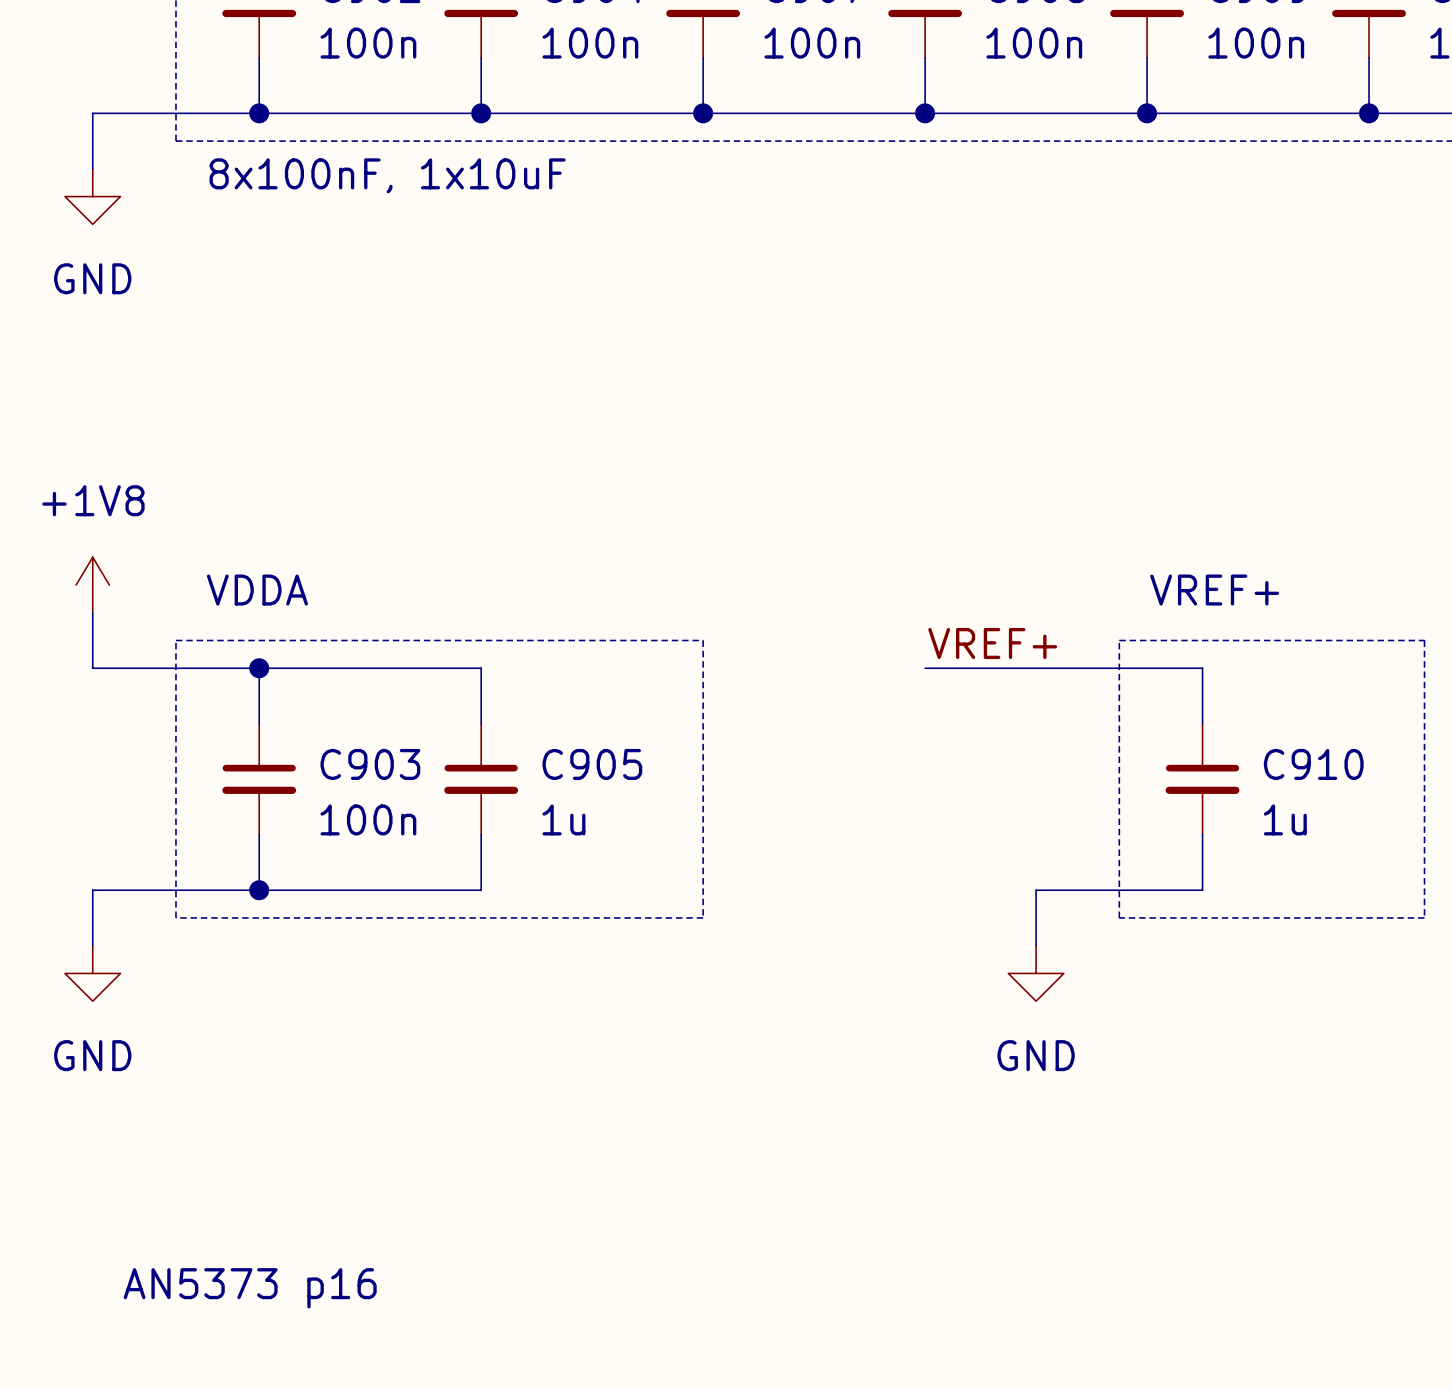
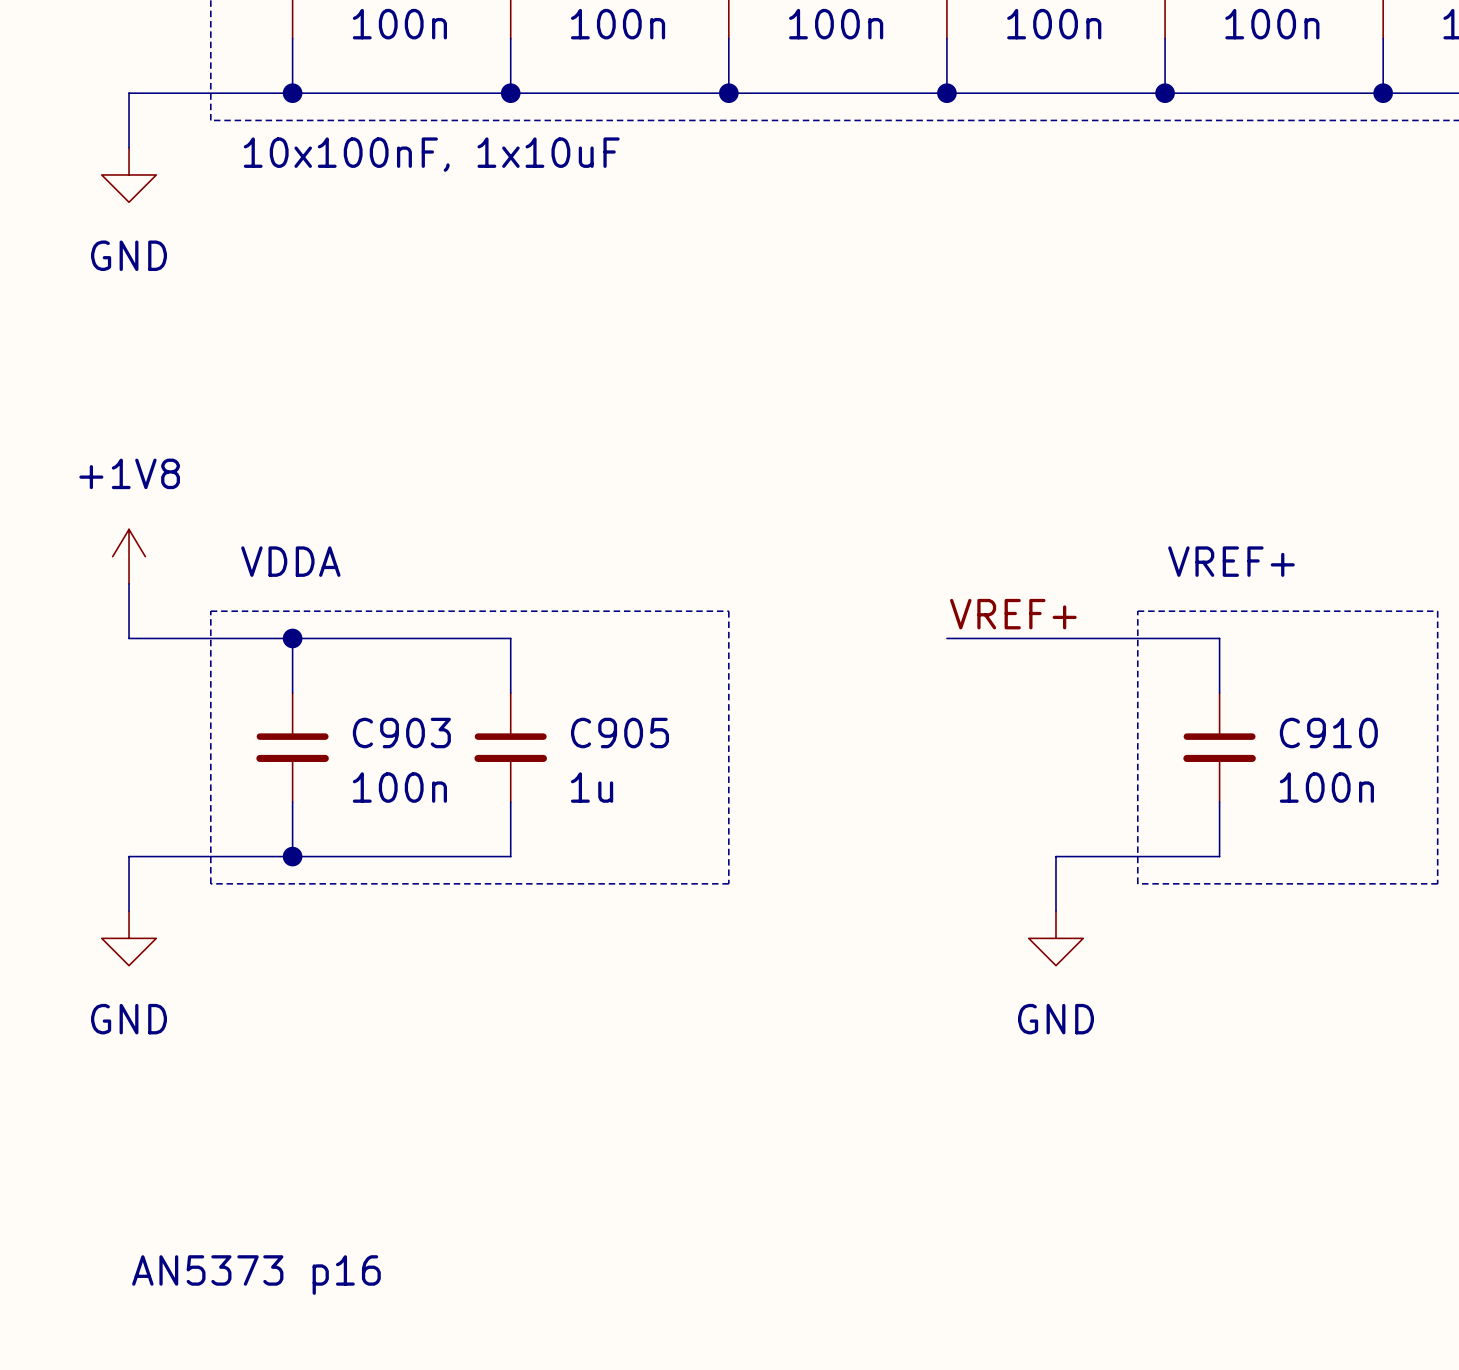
text: 8x100nF, 1x10uF (387, 175) -> 10x100nF, 1x10uF (431, 154)
C910 value: 1u (1285, 819) -> 100n (1326, 787)
text position: AN5373 p16 (250, 1288) -> AN5373 p16 (256, 1275)

